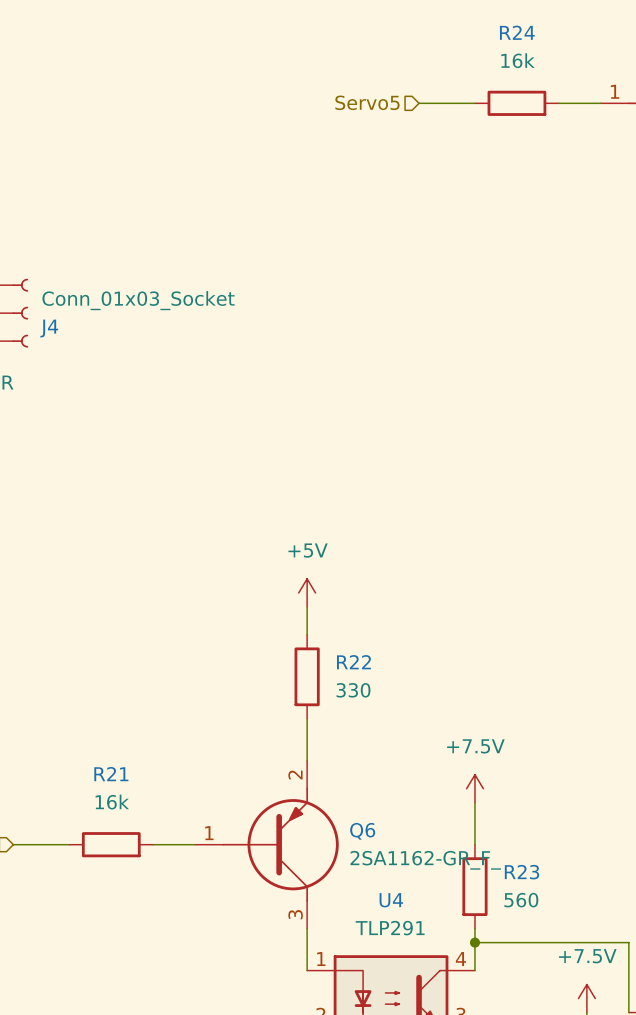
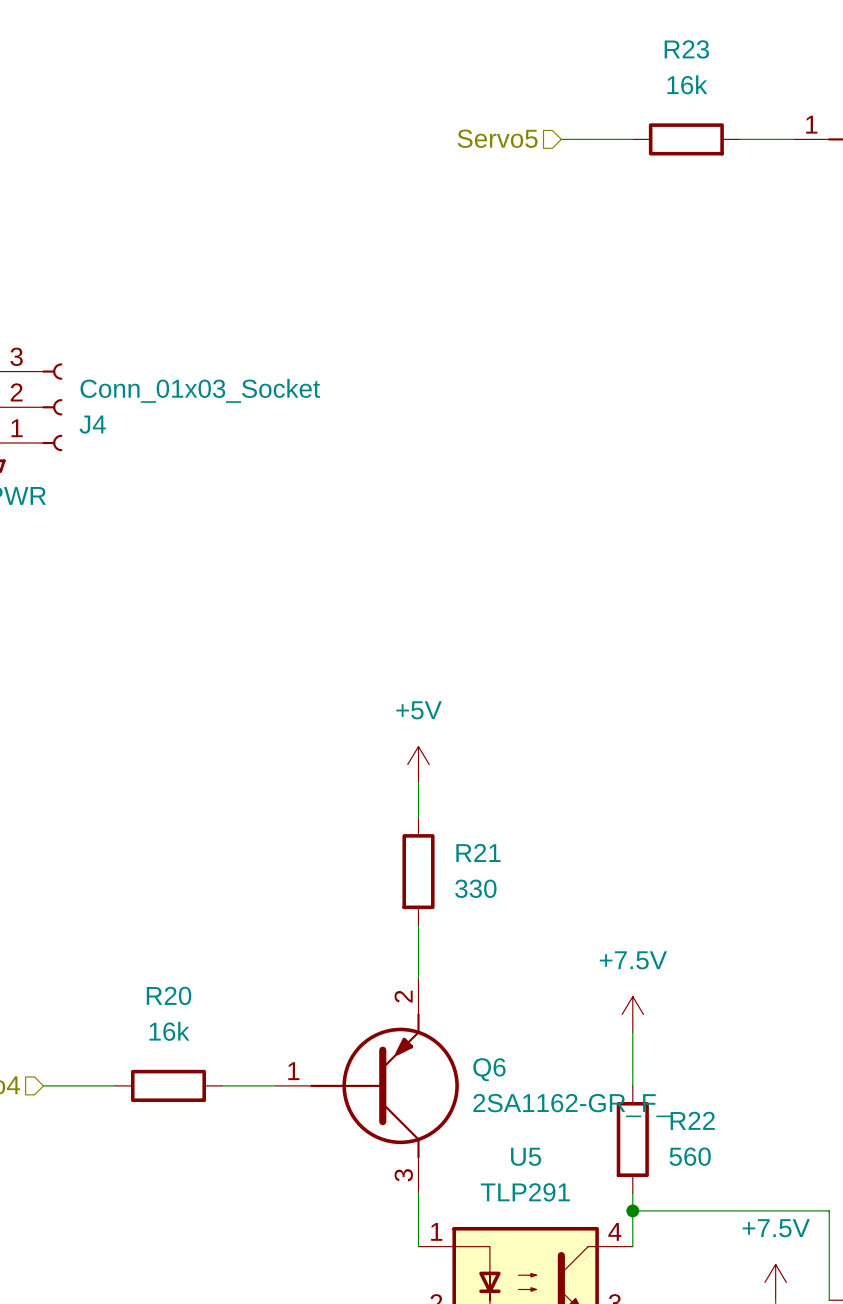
R24 name: R24 (517, 32) -> R23 (686, 49)
R22 name: R22 (353, 662) -> R21 (478, 852)
R21 name: R21 (111, 774) -> R20 (169, 995)
R23 name: R23 (522, 872) -> R22 (692, 1120)
U4 name: U4 (391, 900) -> U5 (526, 1156)

